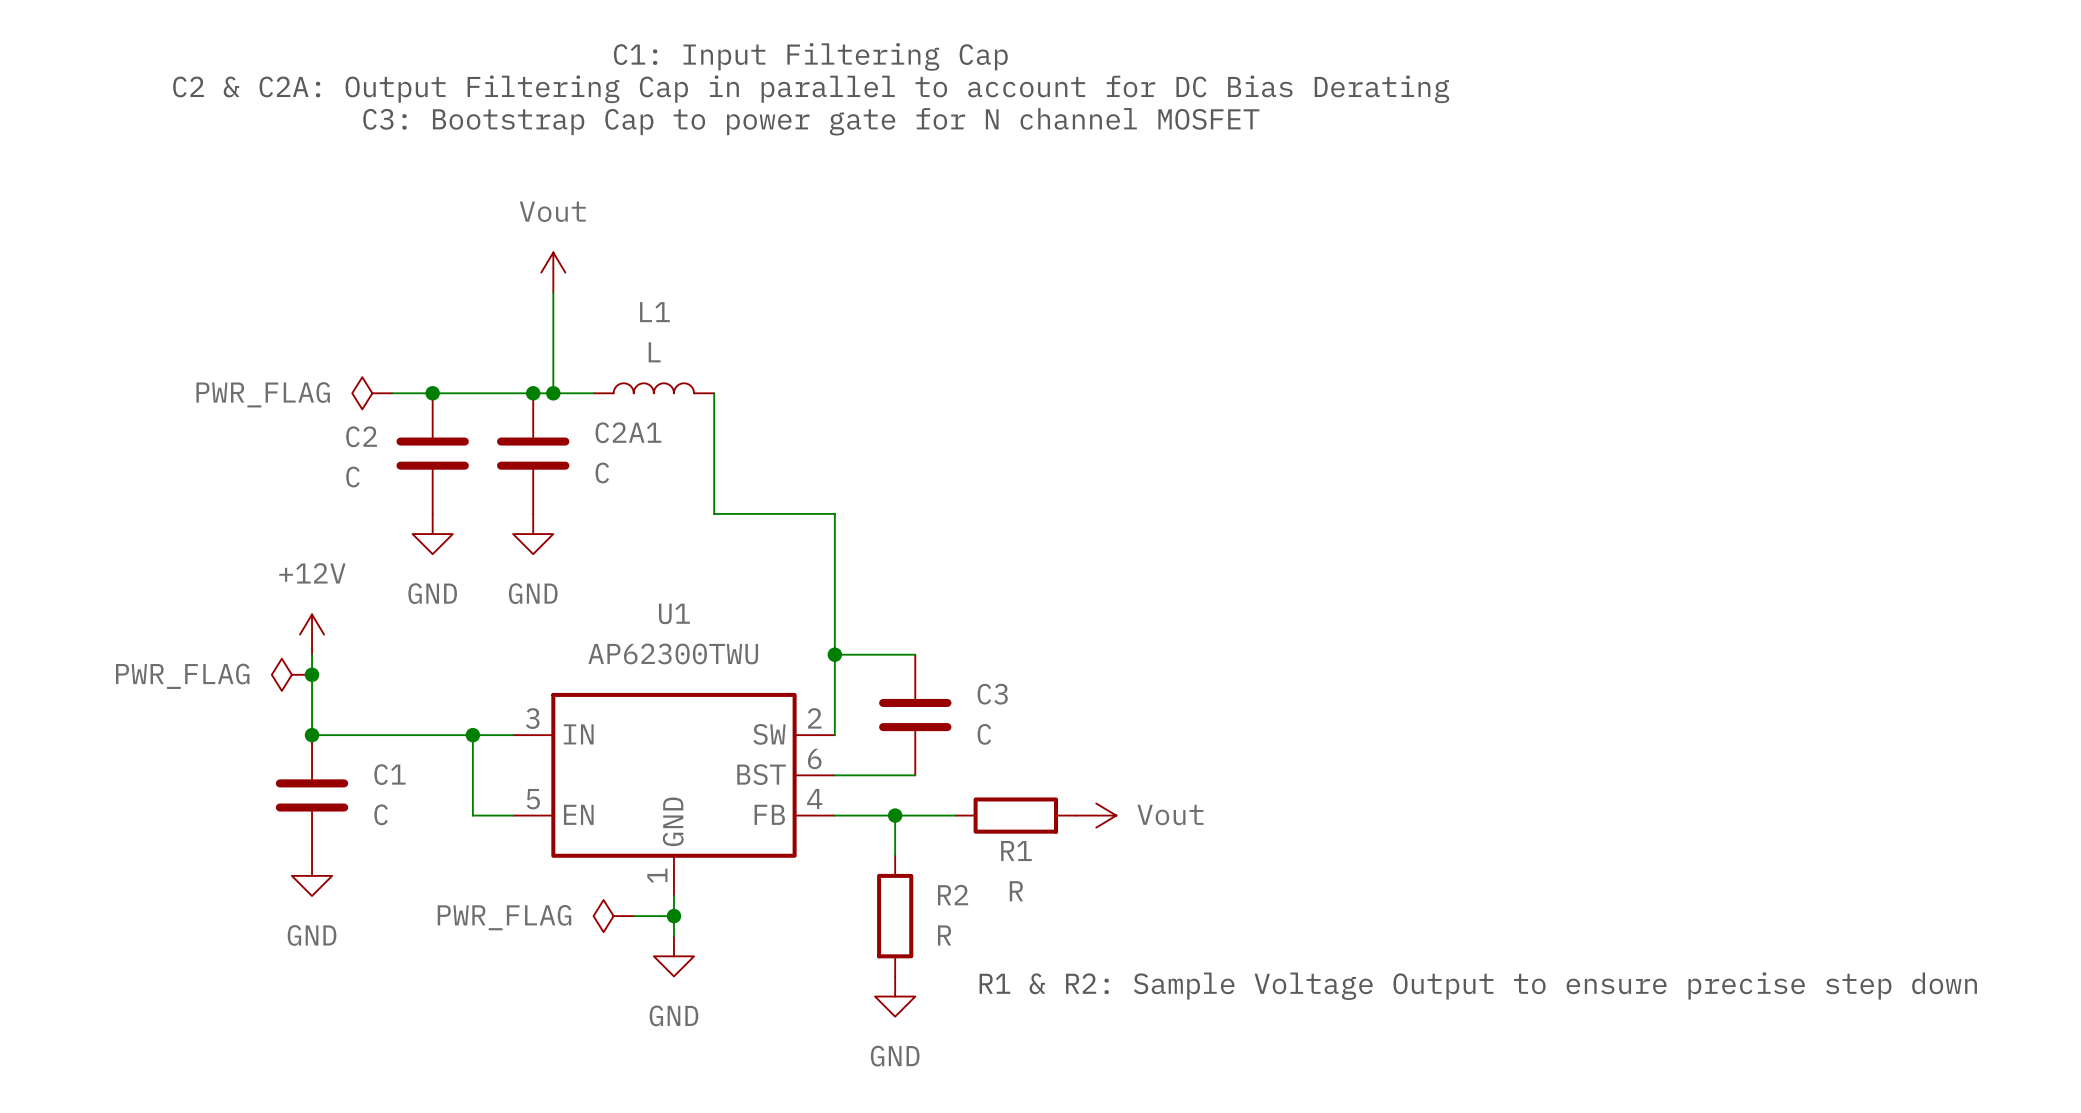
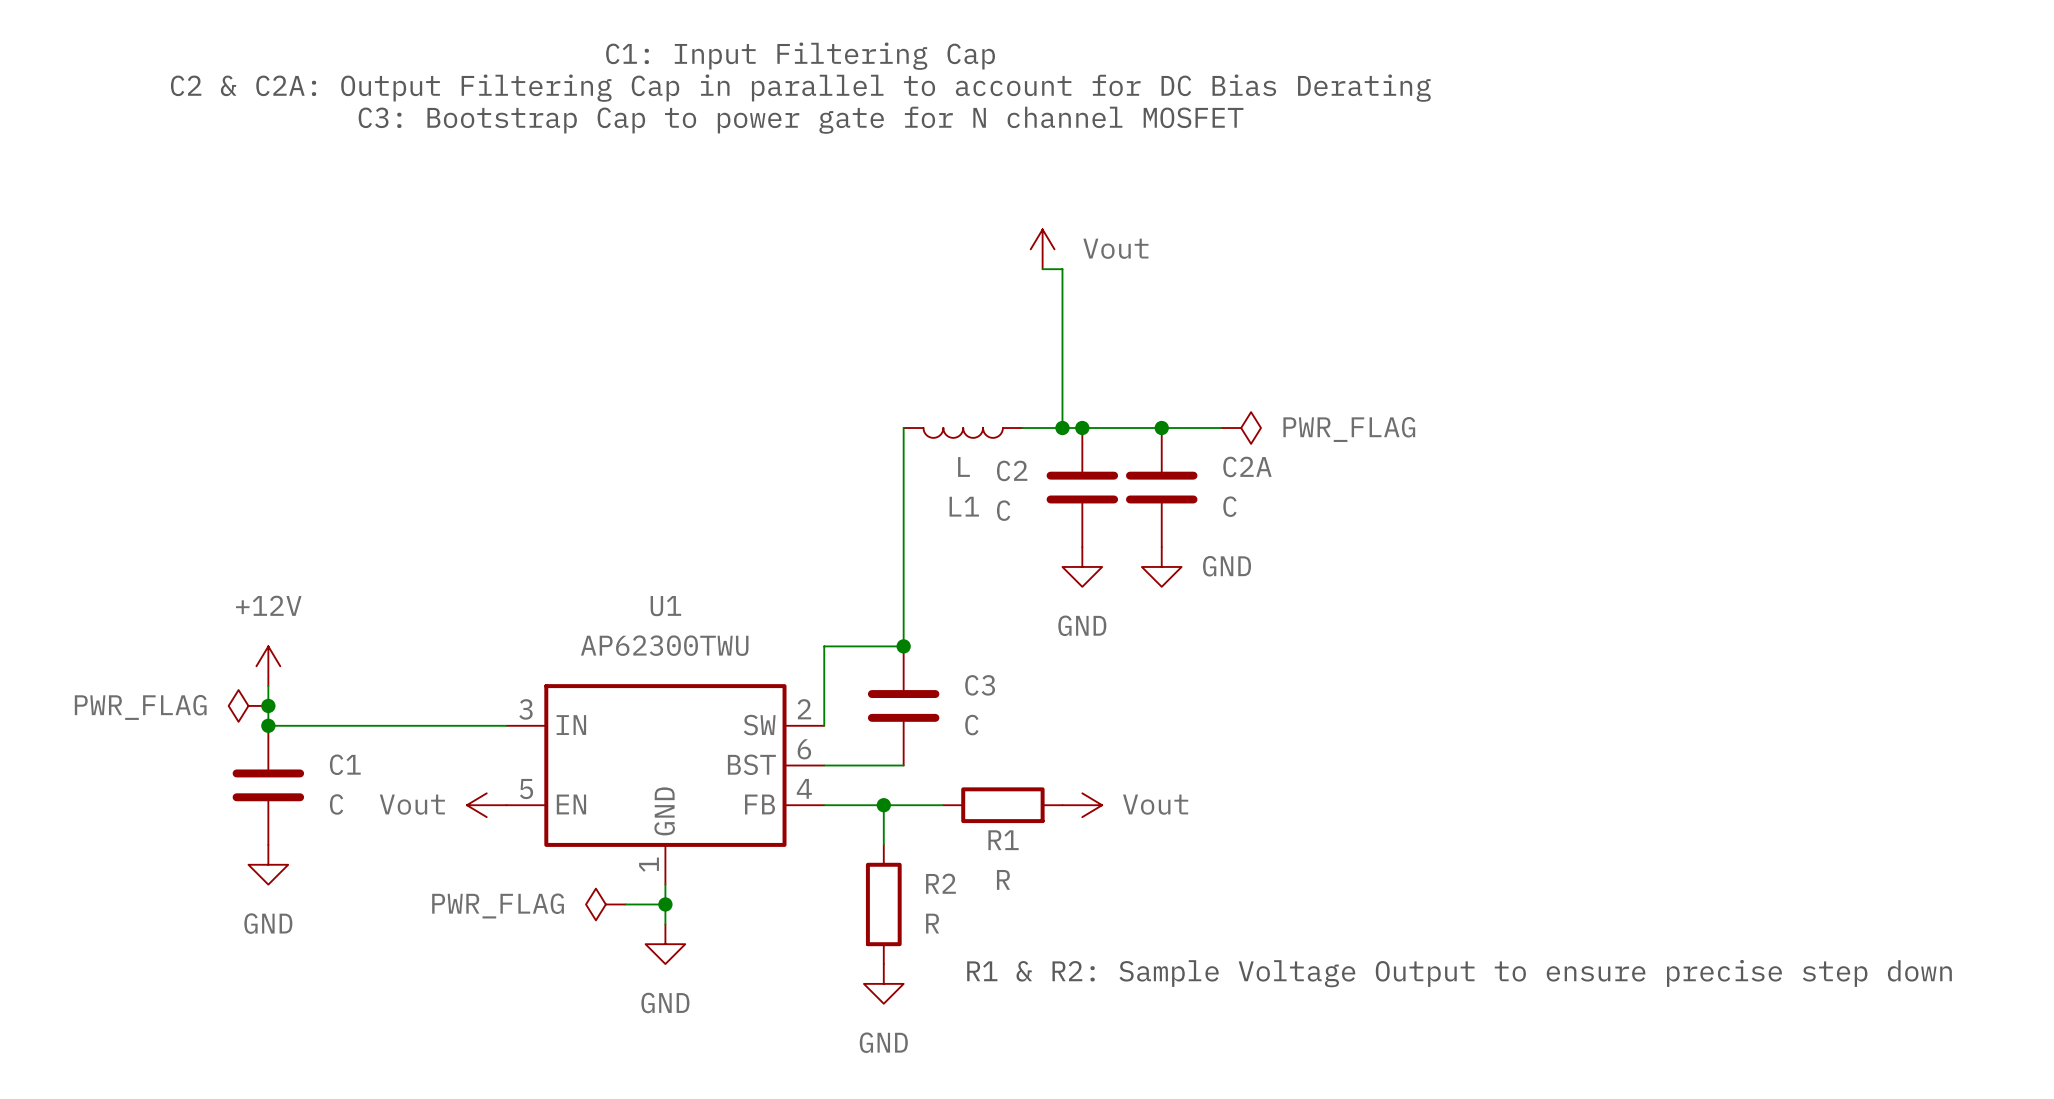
power symbol: none -> Vout (1042, 249)
power symbol: Vout (553, 272) -> none
wire: none -> (1042, 269) (1062, 269) (1062, 428)
wire: (553, 292) (553, 393) -> none
L1 rotation: 0° (653, 388) -> 180° (963, 432)
L1 position: (653, 388) -> (963, 432)
power symbol: PWR_FLAG (372, 393) -> none
wire: (392, 393) (593, 393) -> none
junction: (432, 393) -> none
junction: (533, 393) -> none
junction: (553, 393) -> none
wire: (714, 393) (714, 513) (834, 513) (834, 654) -> none
wire: none -> (903, 428) (903, 646)
wire: none -> (1022, 428) (1221, 428)
junction: none -> (1062, 428)
junction: none -> (1082, 428)
junction: none -> (1161, 428)
power symbol: none -> PWR_FLAG (1241, 428)
C2 position: (432, 453) -> (1082, 487)
C2A1: C (533, 453) -> none
C2A: none -> C (1161, 487)
power symbol: GND (432, 534) -> none
power symbol: GND (533, 534) -> none
power symbol: none -> GND (1082, 566)
power symbol: none -> GND (1161, 566)
power symbol position: +12V (312, 634) -> +12V (268, 666)
wire: (312, 654) (312, 735) -> (268, 686) (268, 725) (308, 725)
junction position: (834, 654) -> (903, 646)
power symbol position: PWR_FLAG (291, 674) -> PWR_FLAG (248, 705)
junction: (312, 674) -> none
junction: none -> (268, 705)
junction: none -> (268, 725)
junction: (312, 735) -> none
wire: (472, 735) (472, 815) (513, 815) -> none
junction: (472, 735) -> none
C1 position: (312, 795) -> (268, 785)
power symbol: none -> Vout (486, 805)
power symbol position: GND (312, 875) -> GND (268, 864)

